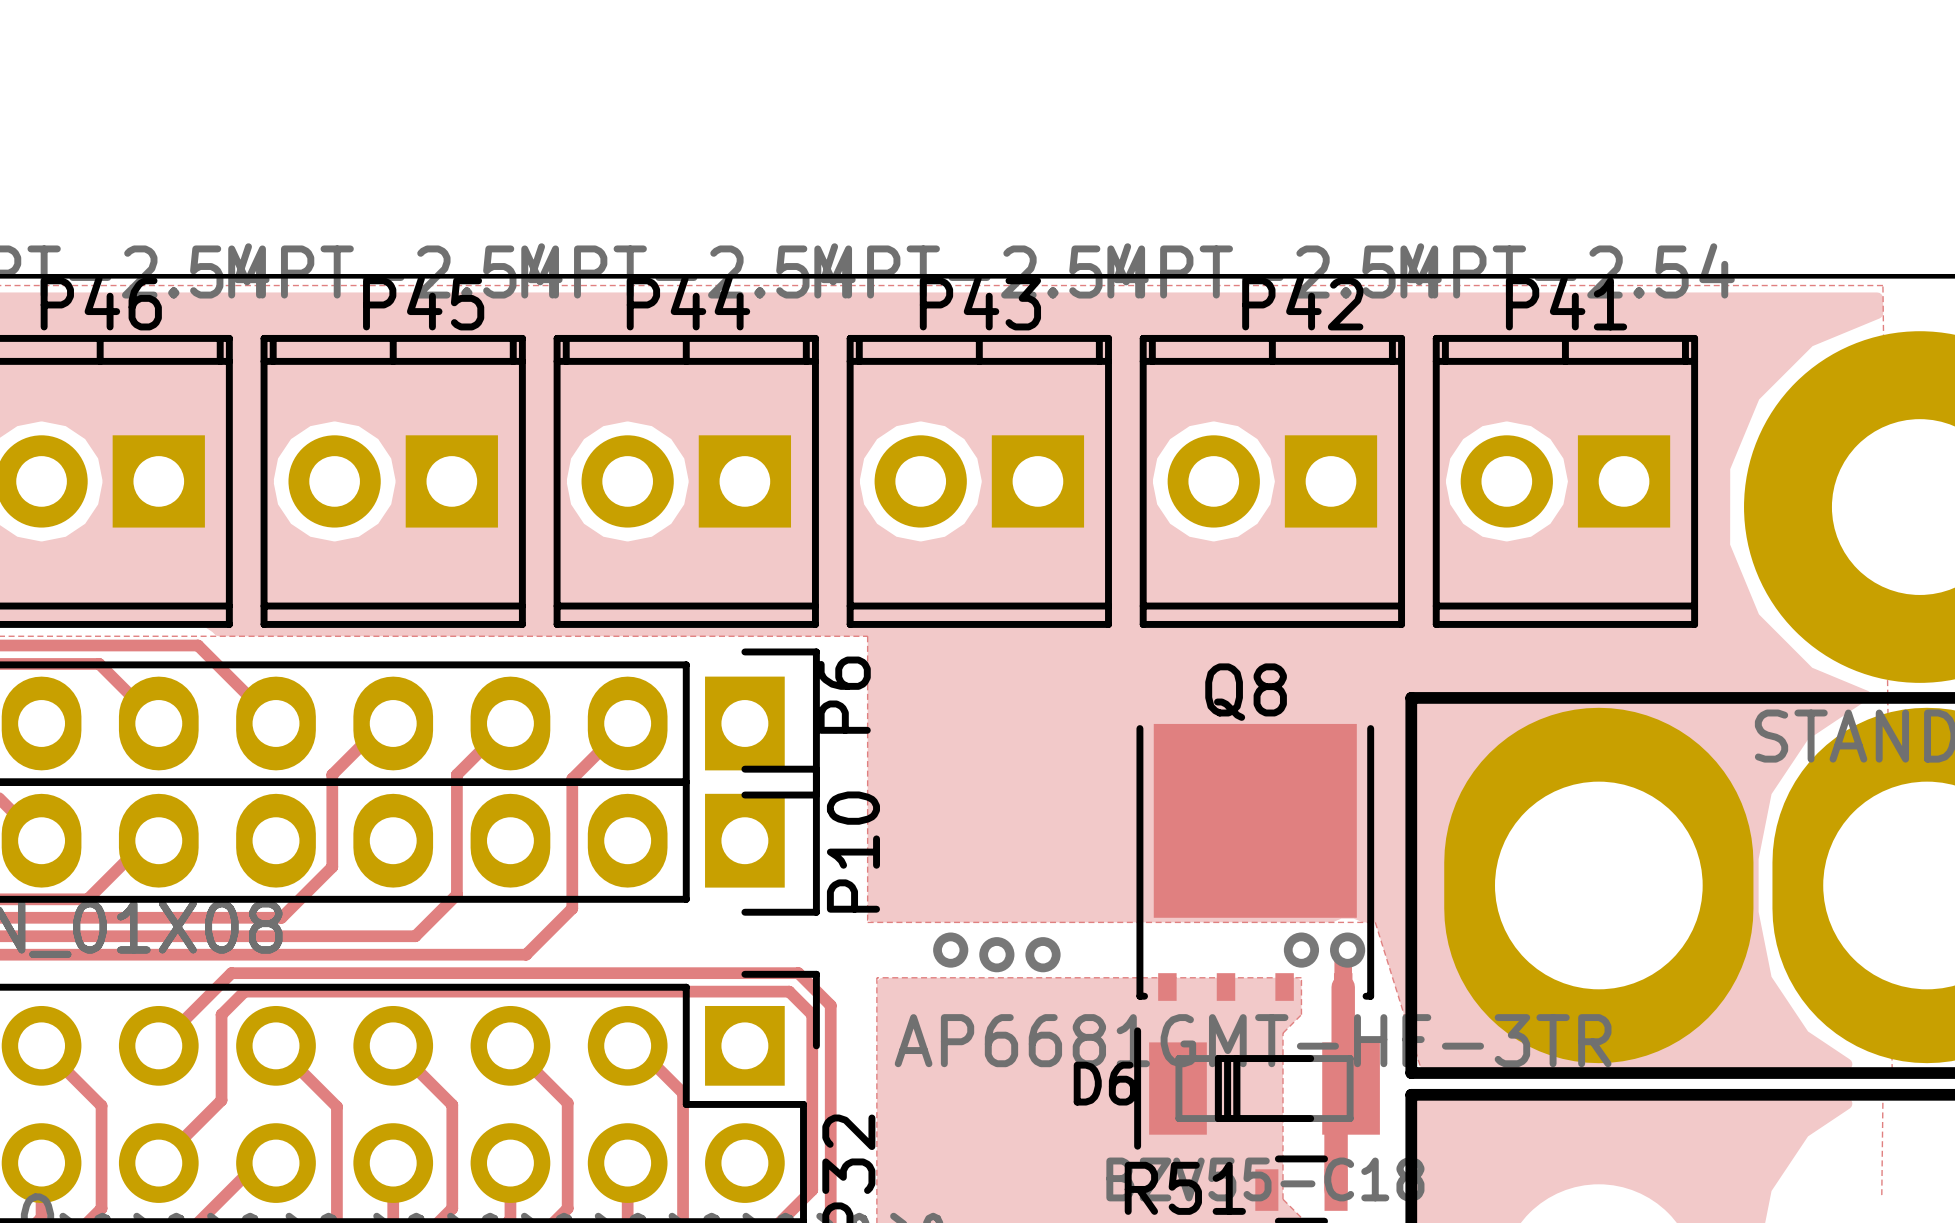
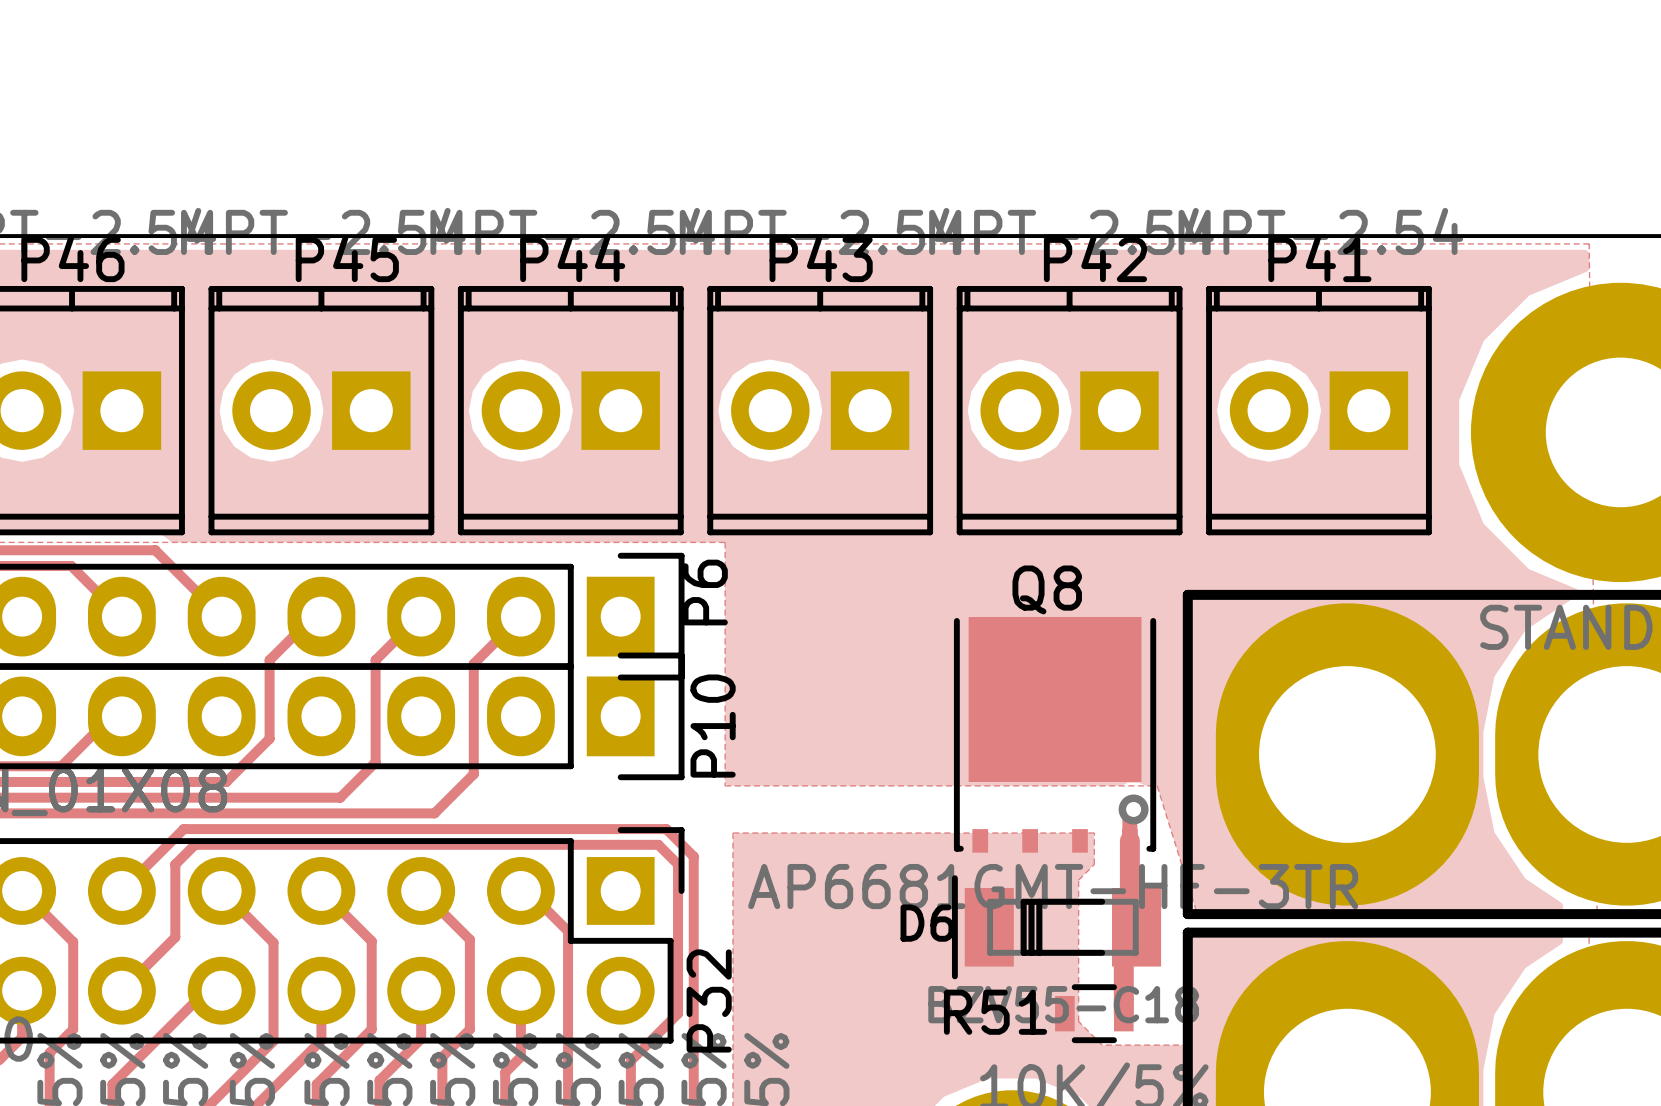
via: (950, 950) -> none
via: (1301, 950) -> none
via: (996, 954) -> none
via: (1043, 954) -> none

